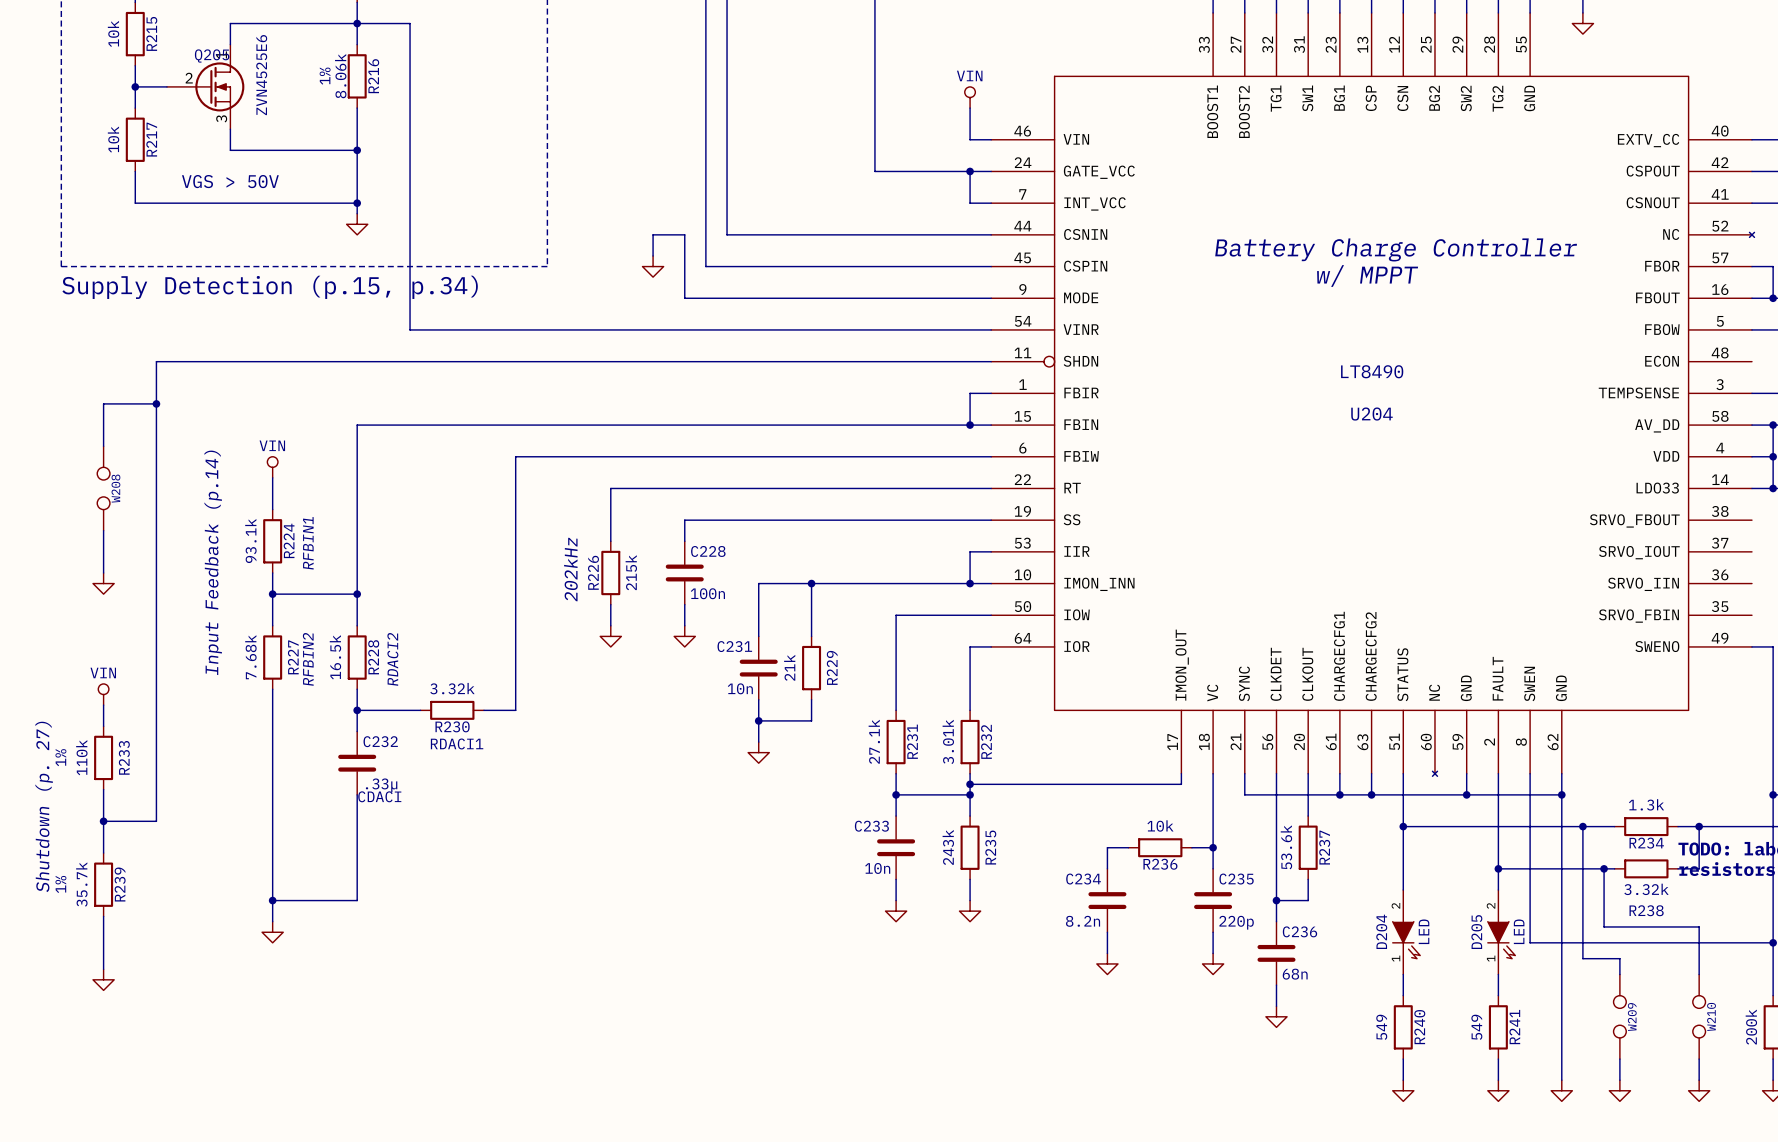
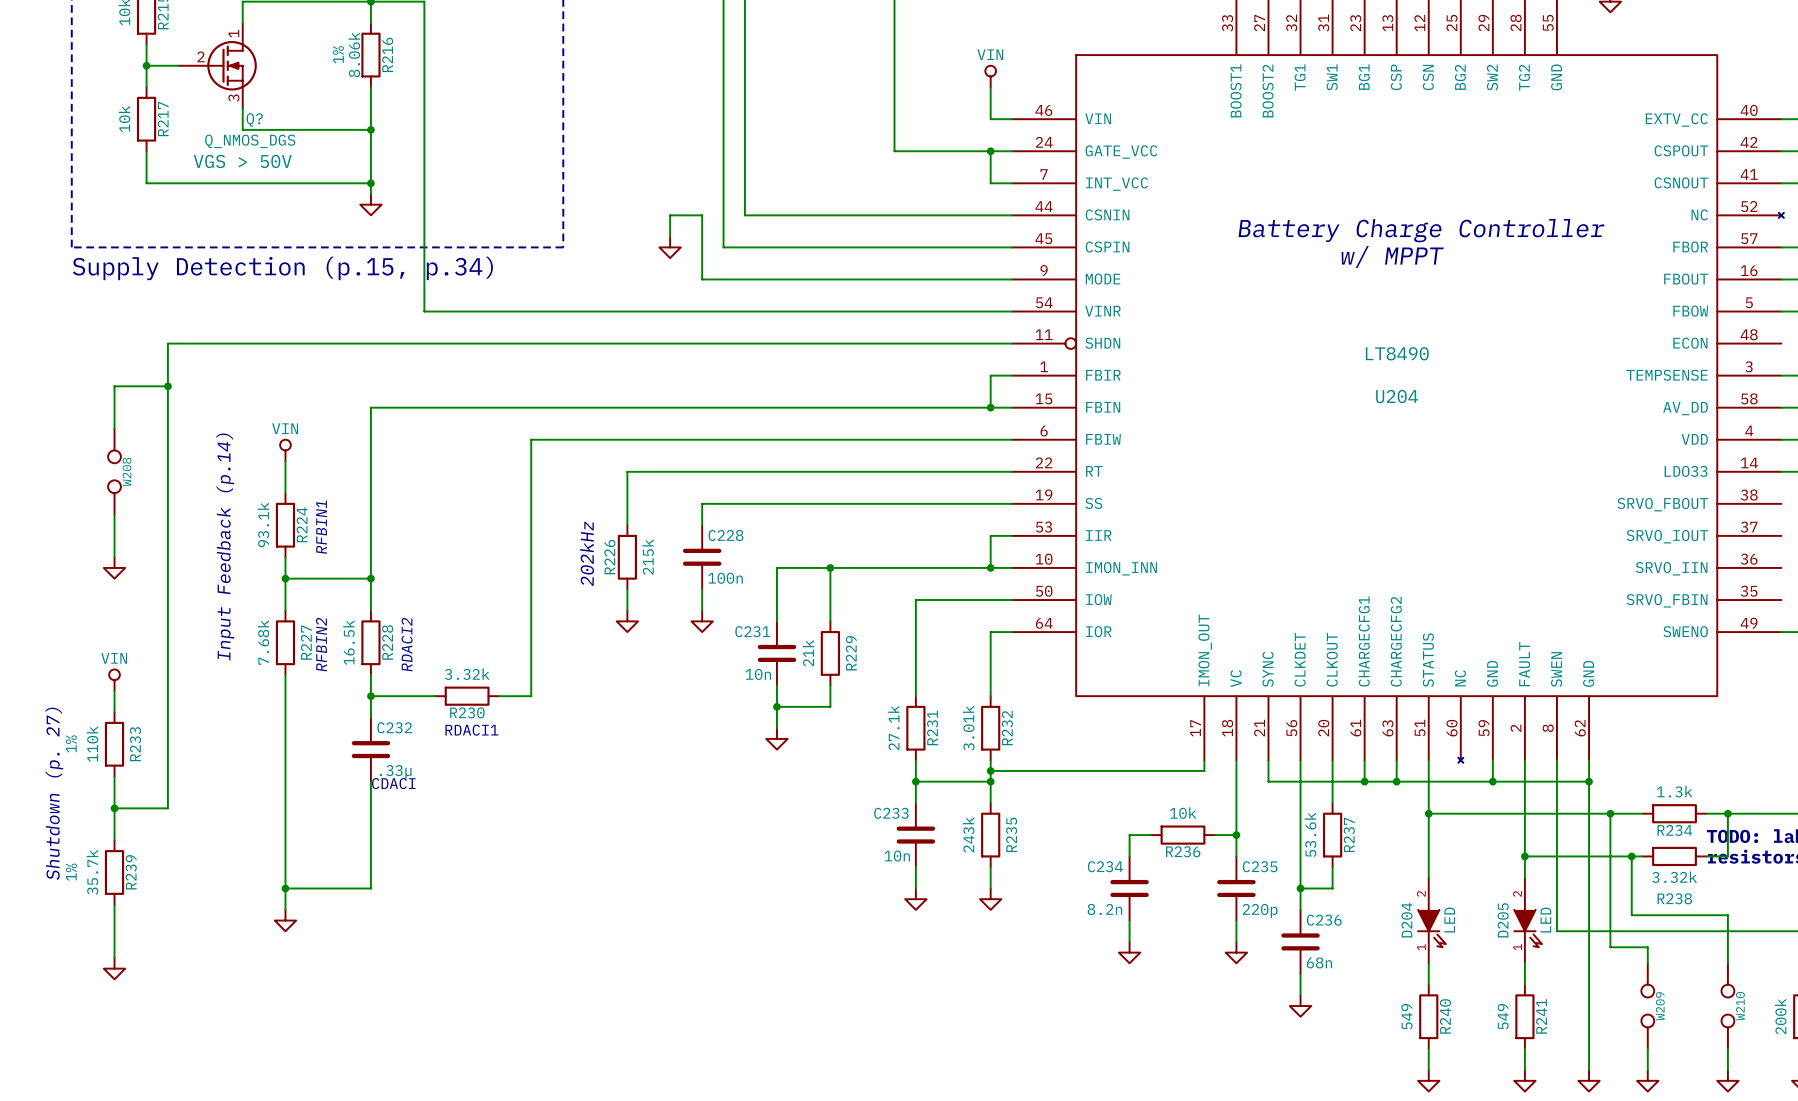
Q205 name: Q205 (212, 55) -> Q? (254, 119)
Q205 value: ZVN4525E6 (261, 75) -> Q_NMOS_DGS (250, 141)

